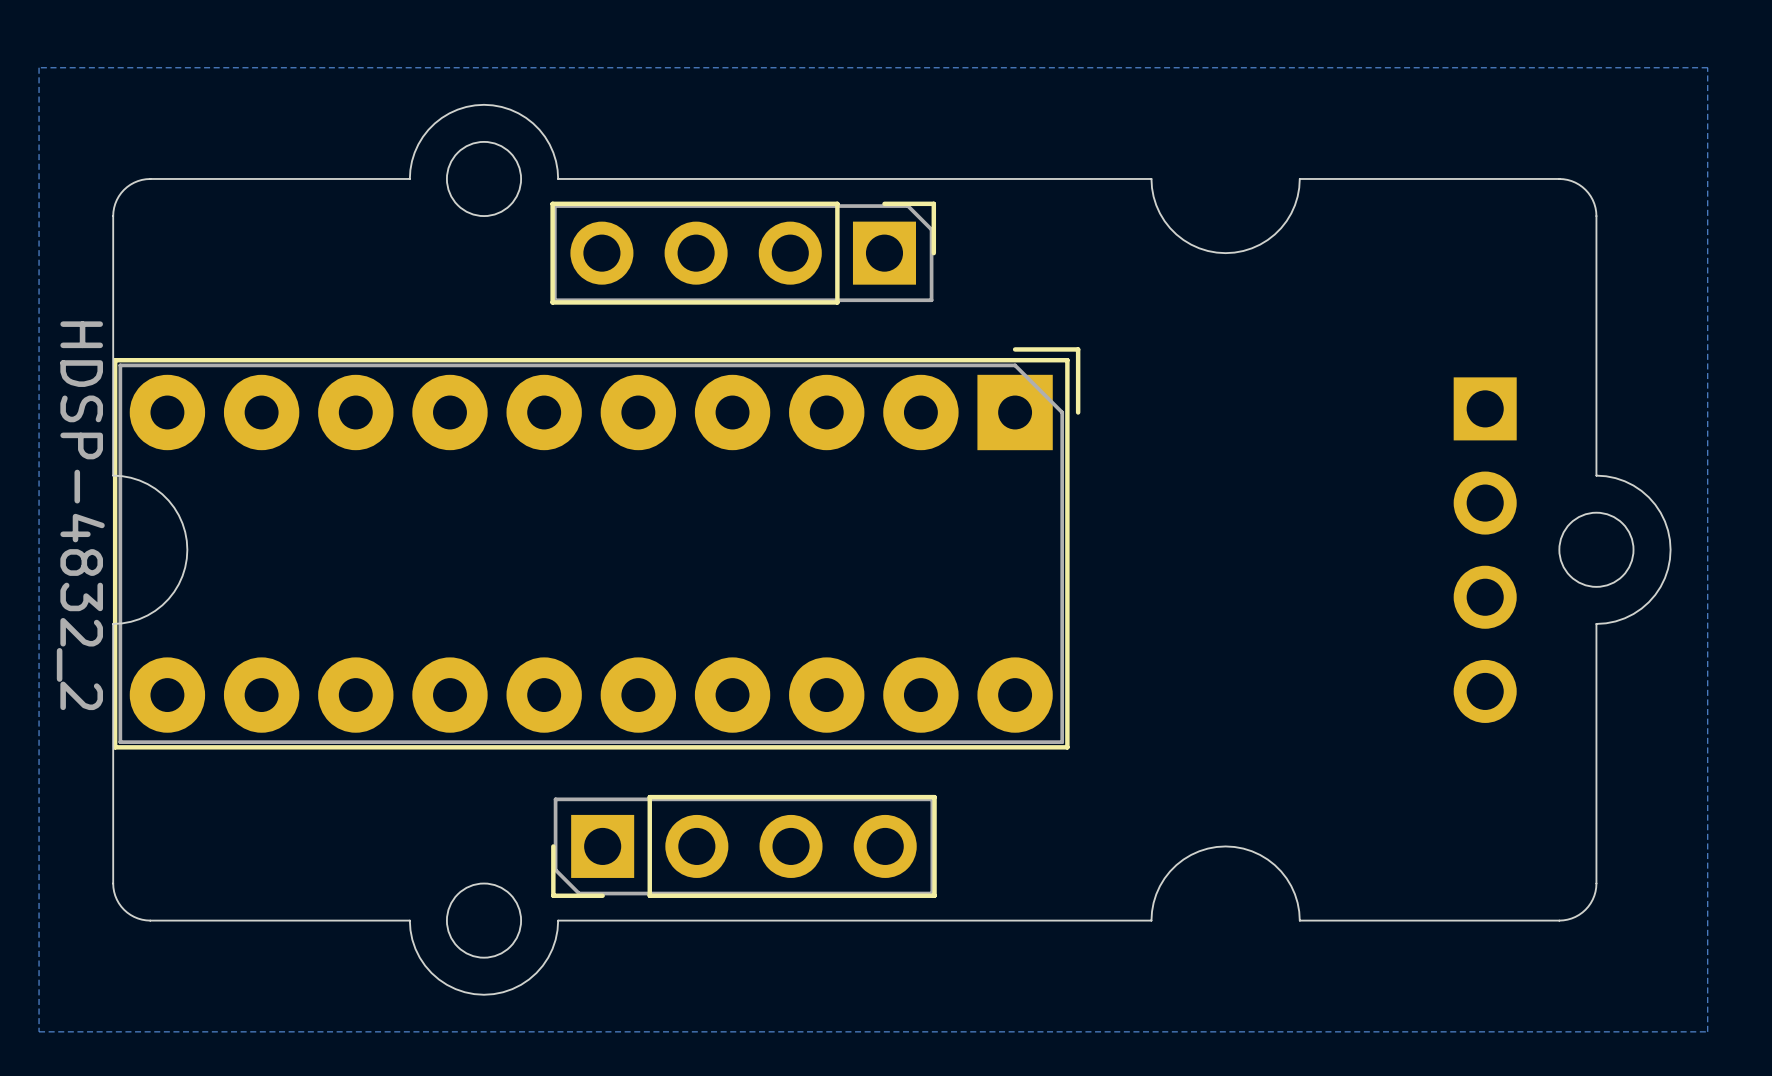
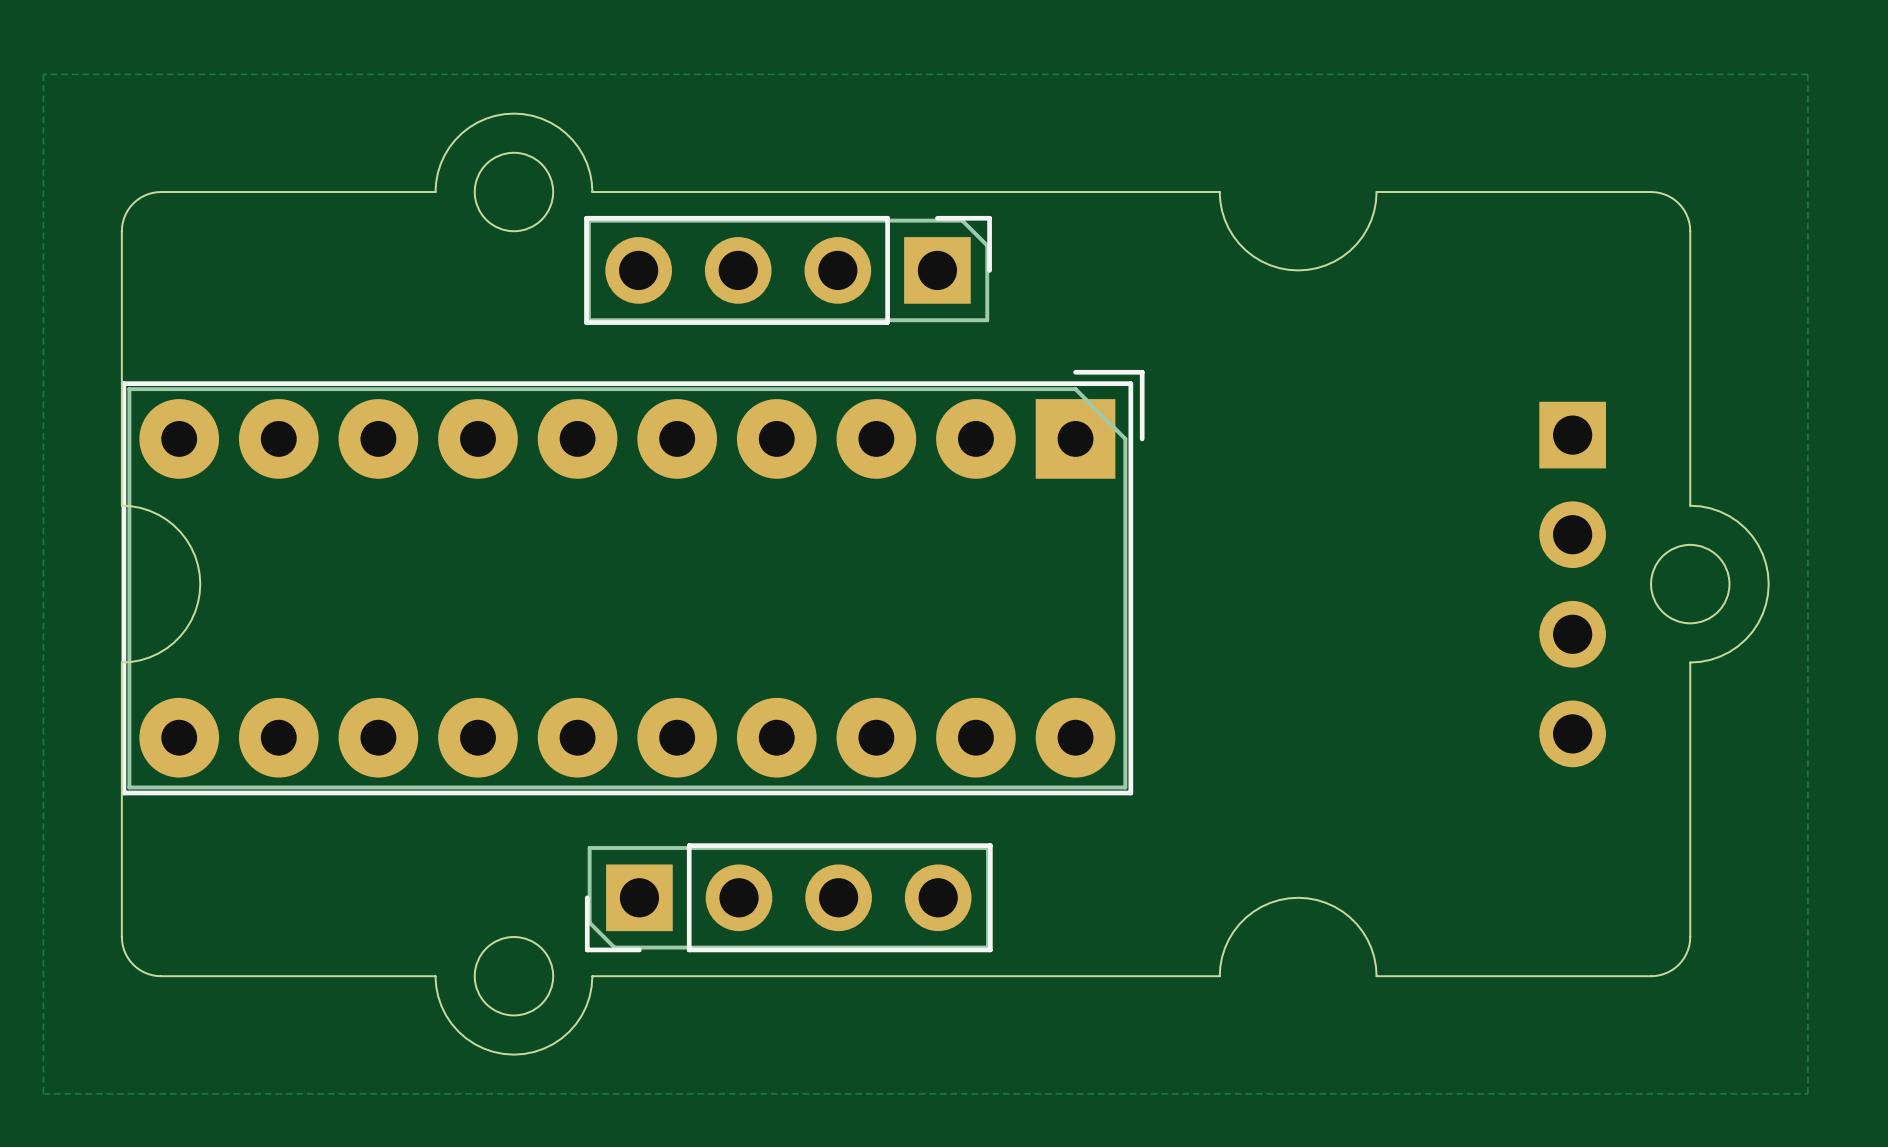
part value: HDSP-4832_2 (80, 515) -> none

